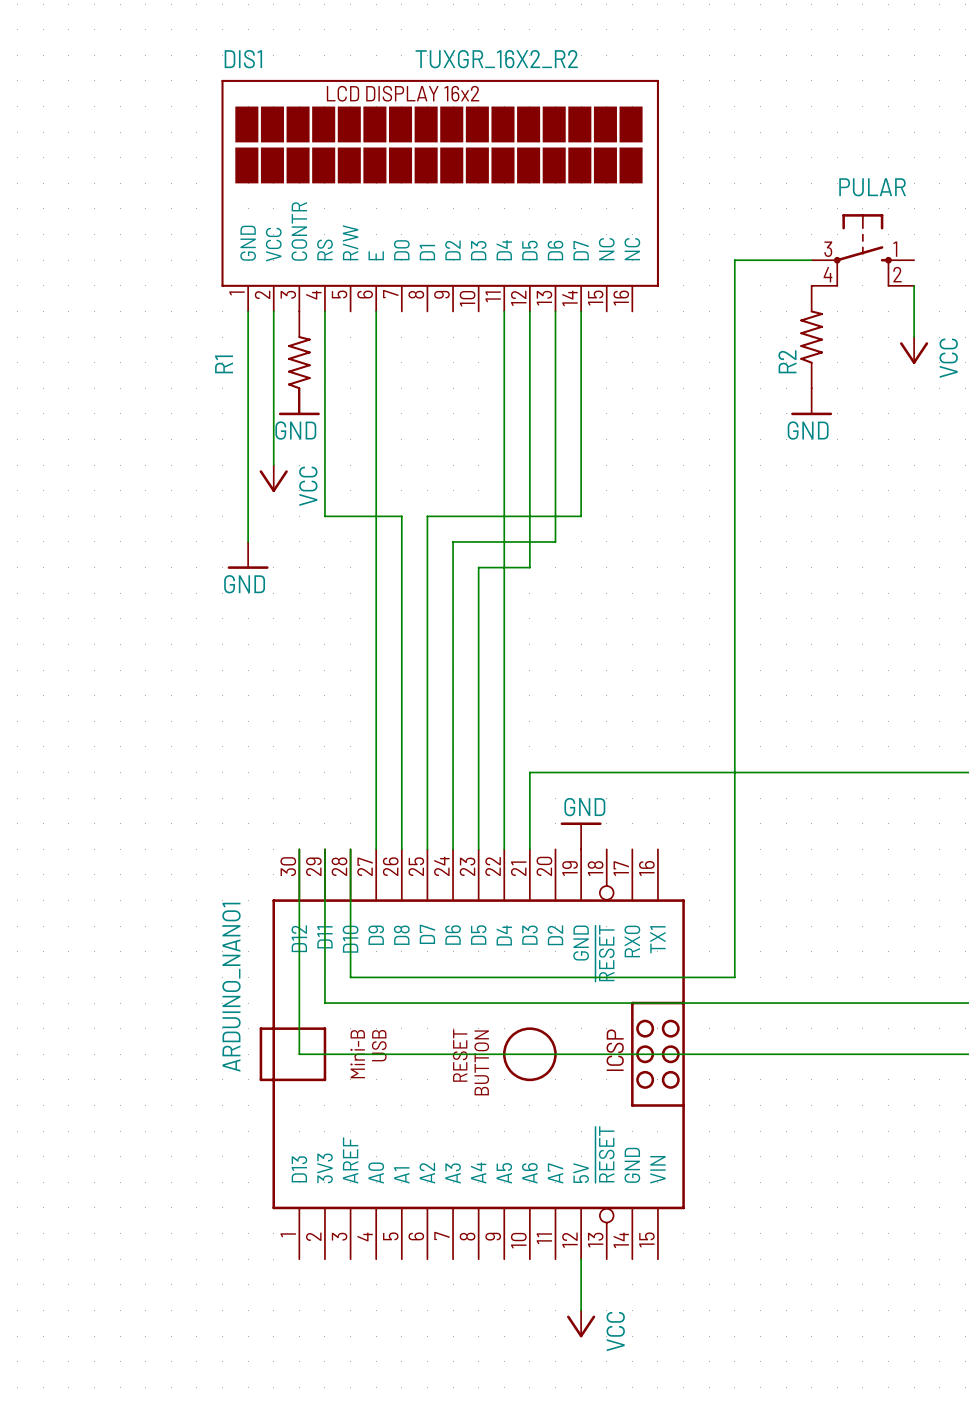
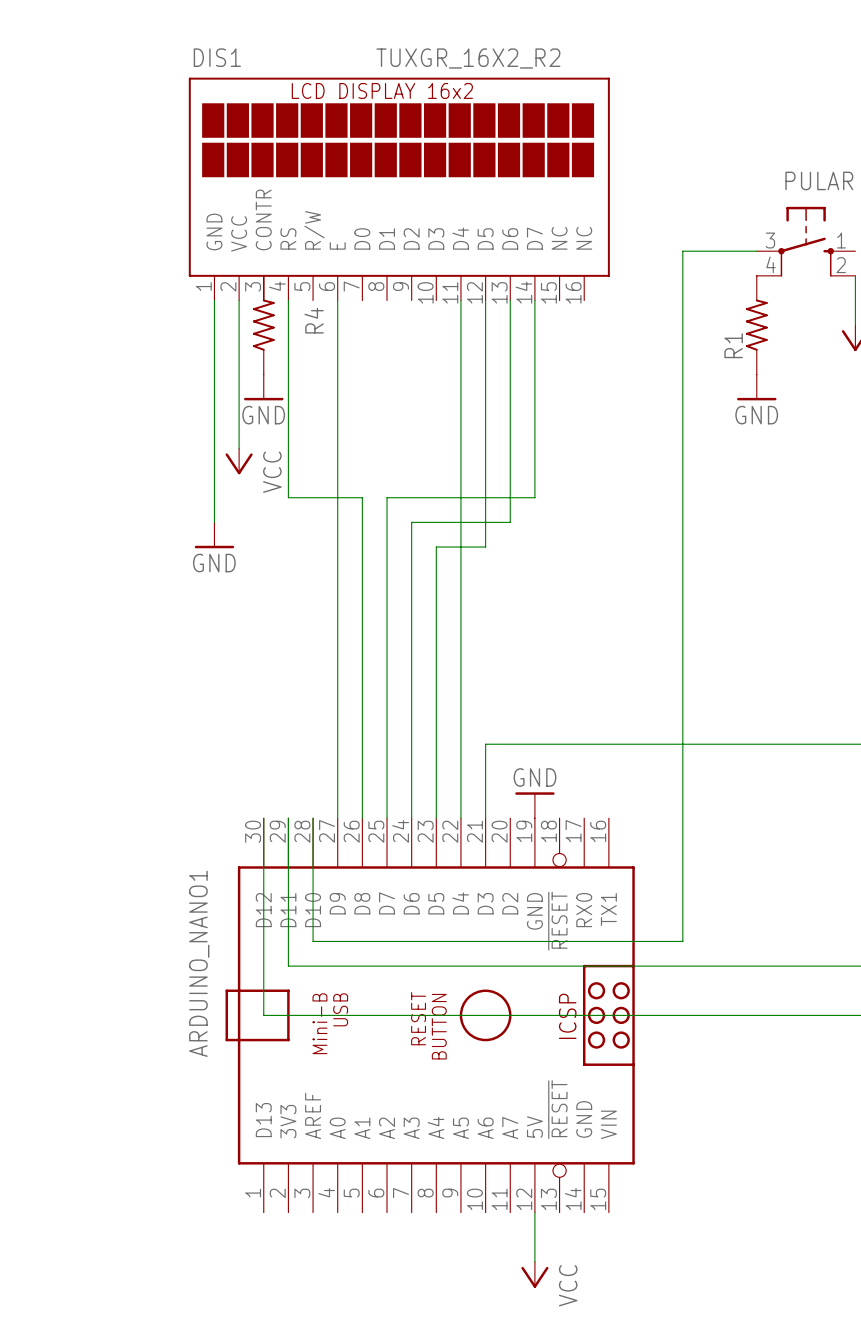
R4: none -> (263, 325)
R2 name: R2 (787, 361) -> R1 (733, 345)
R1: (299, 362) -> none

